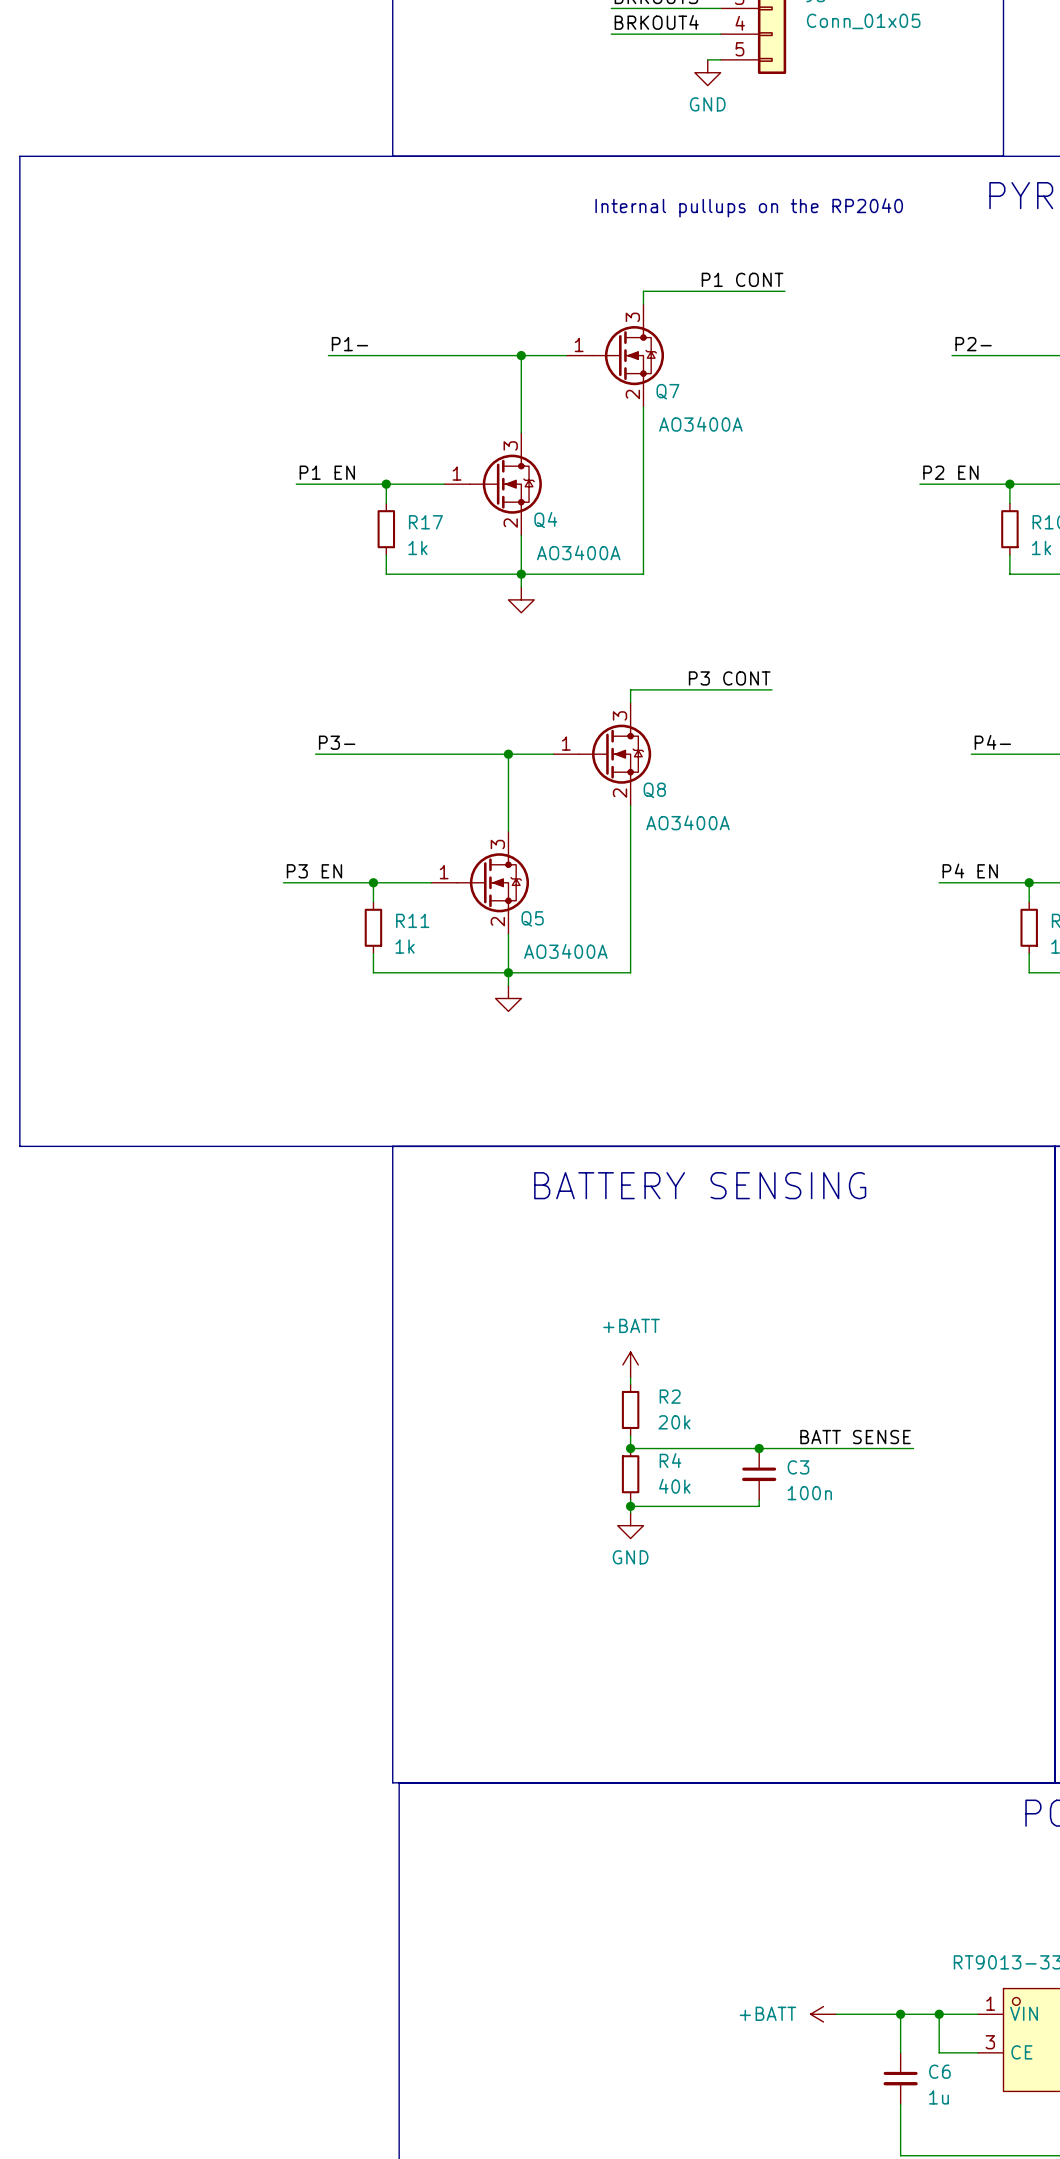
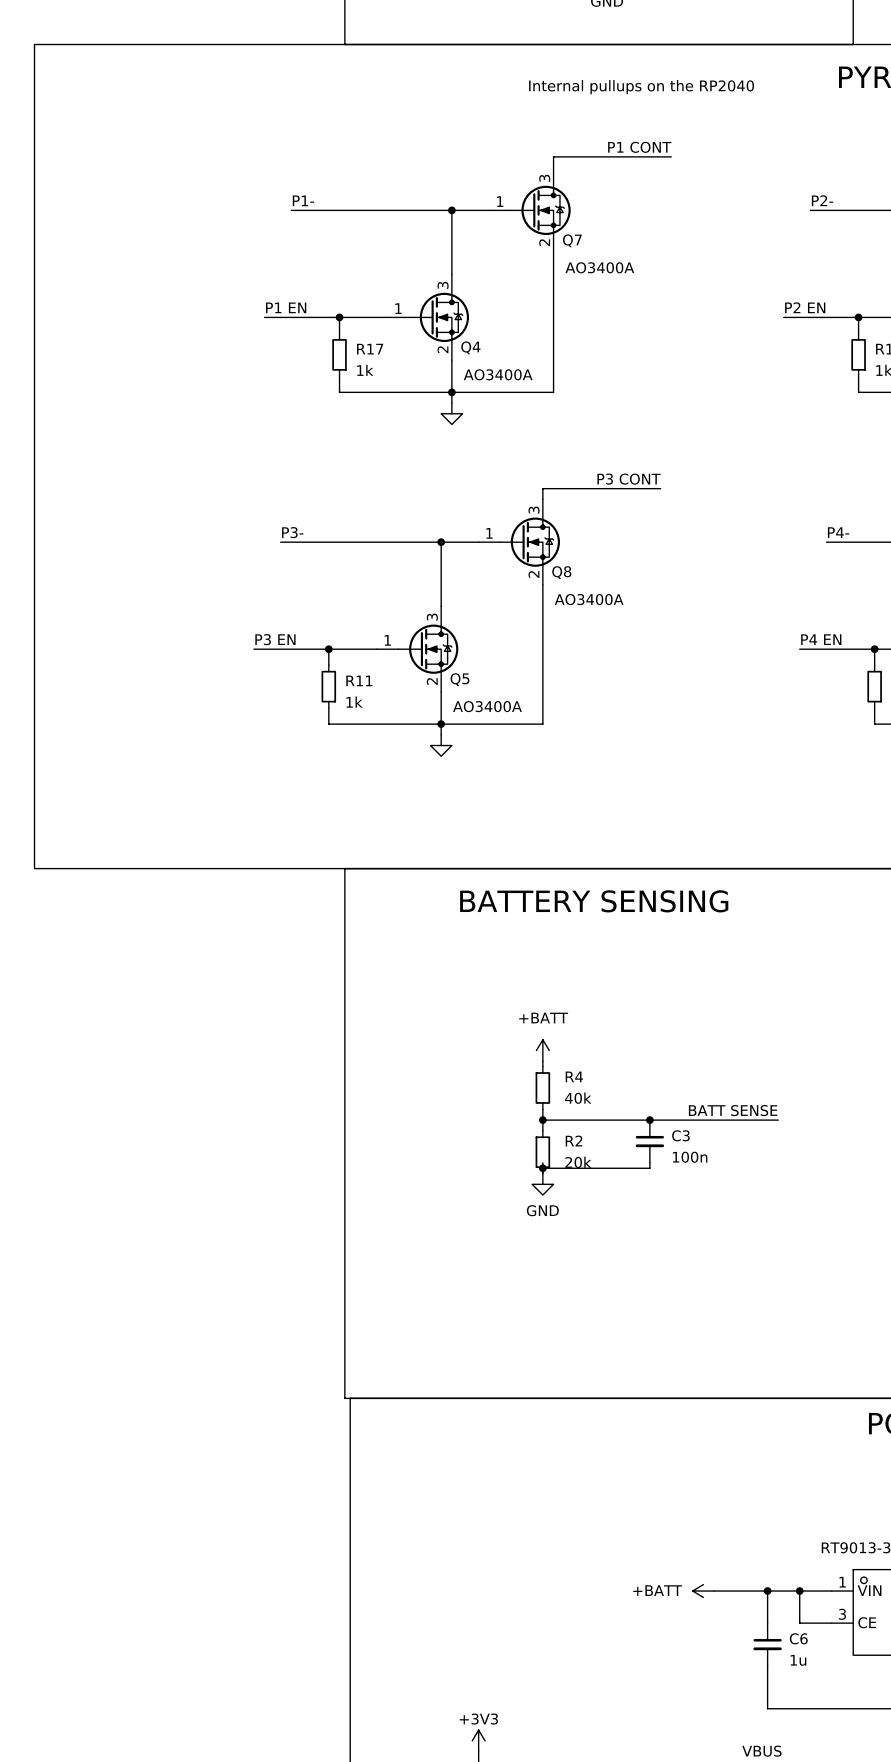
R2 name: R2 (670, 1396) -> R4 (574, 1076)
R2 value: 20k (674, 1422) -> 40k (578, 1098)
R4: 40k (630, 1474) -> none
R2: none -> 20k (542, 1152)

